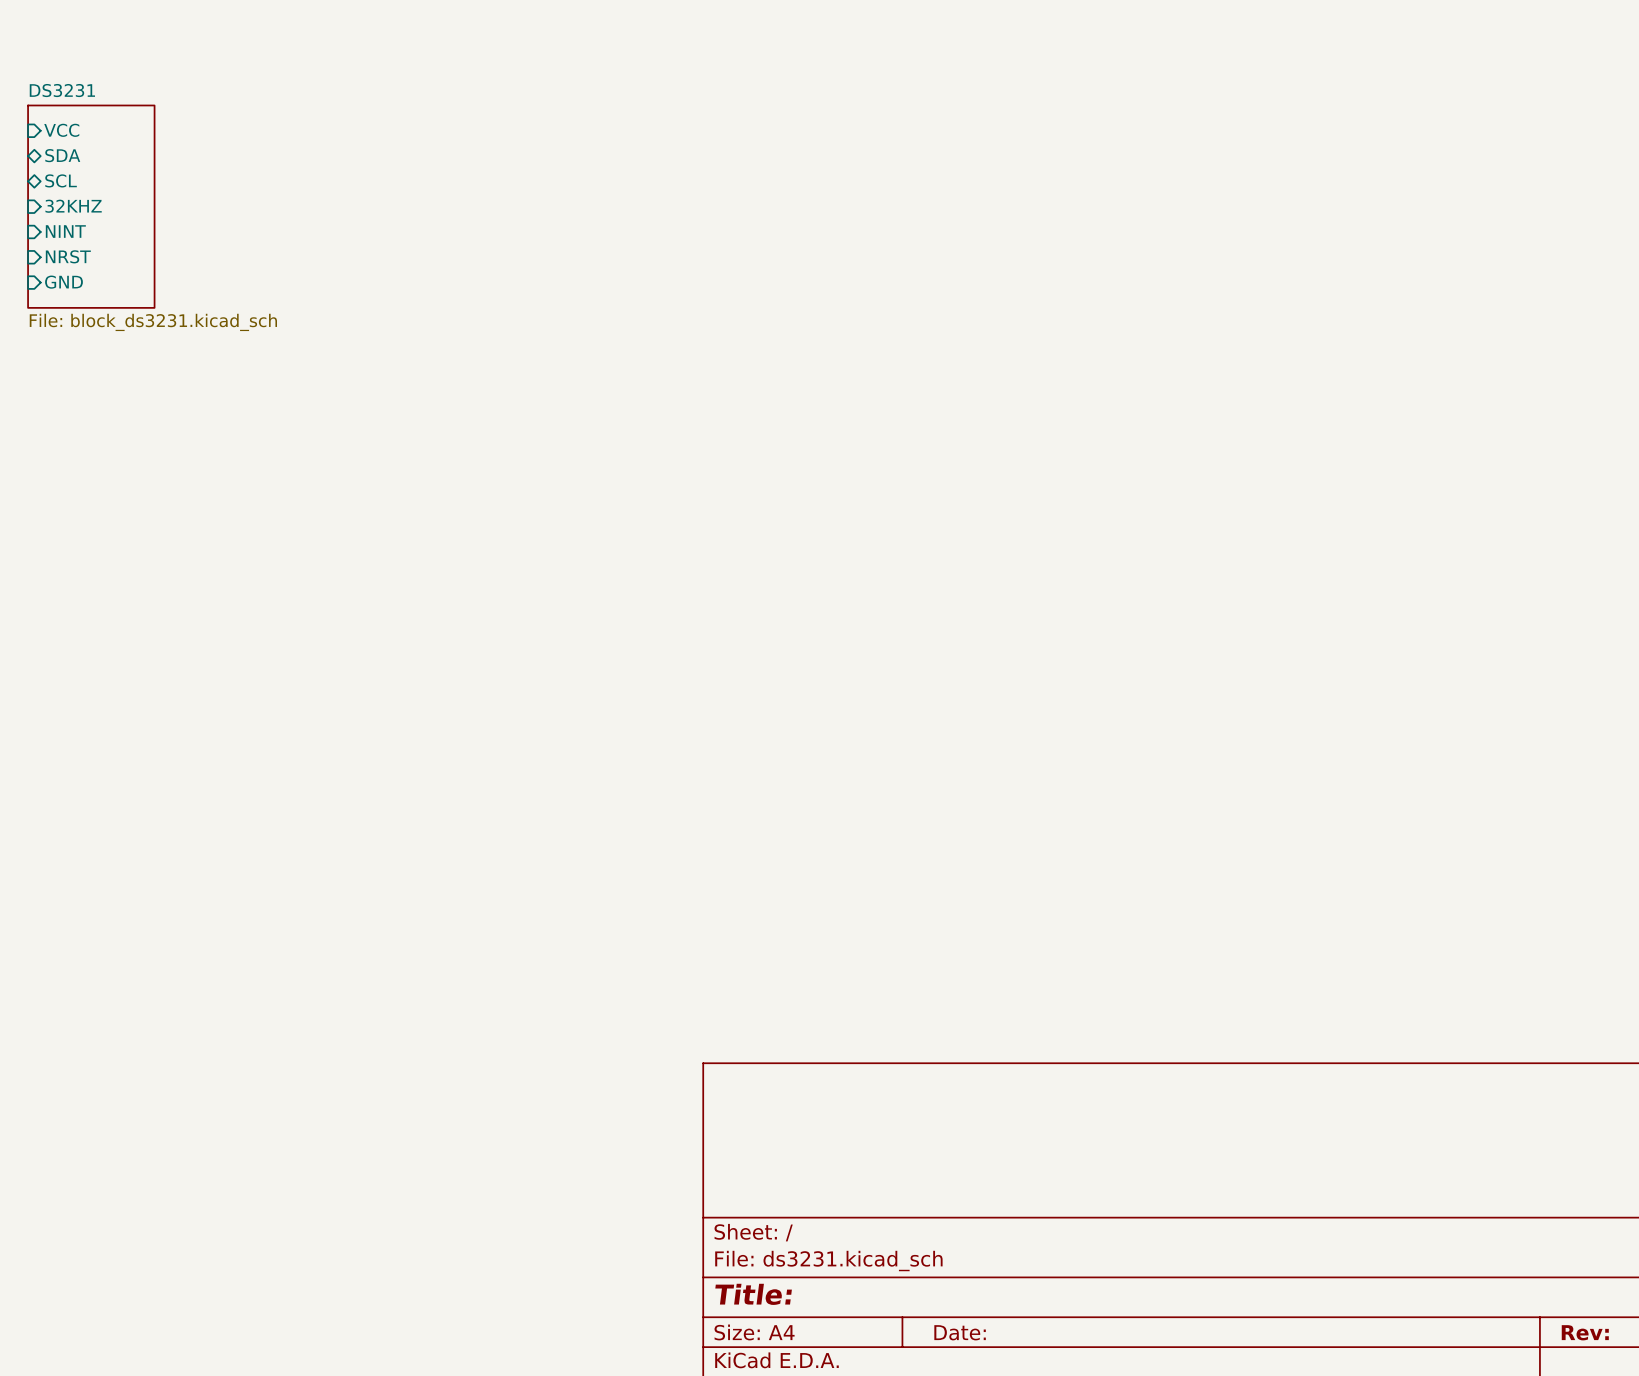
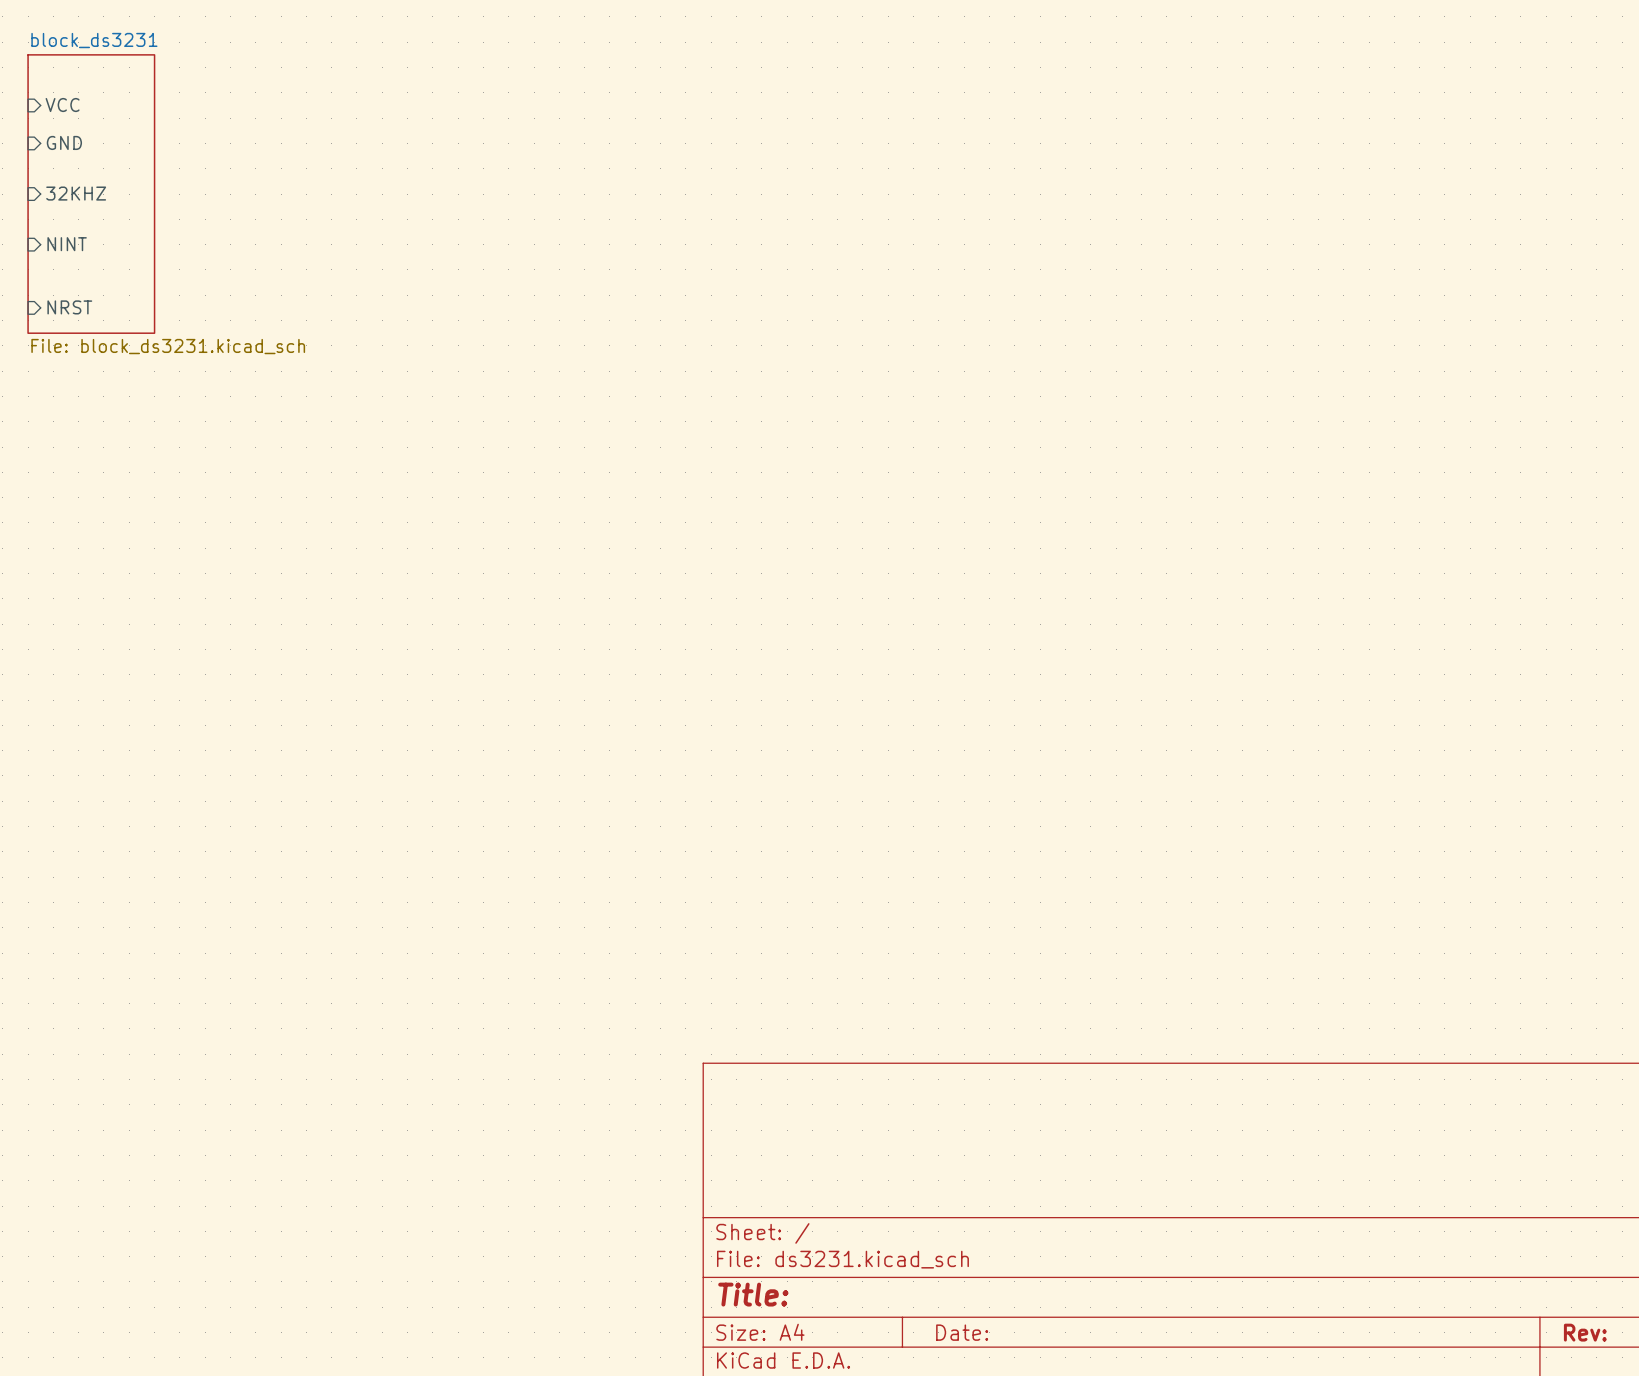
sheet pin position: VCC (61, 130) -> VCC (62, 105)
sheet pin: SDA (62, 155) -> none
sheet pin: SCL (61, 180) -> none
sheet block_ds3231: none -> File: block_ds3231.kicad_sch (91, 194)
sheet pin position: 32KHZ (73, 206) -> 32KHZ (76, 193)
sheet DS3231: File: block_ds3231.kicad_sch (91, 206) -> none
sheet pin position: NINT (65, 231) -> NINT (67, 244)
sheet pin position: NRST (68, 256) -> NRST (69, 307)
sheet pin position: GND (63, 282) -> GND (64, 142)

